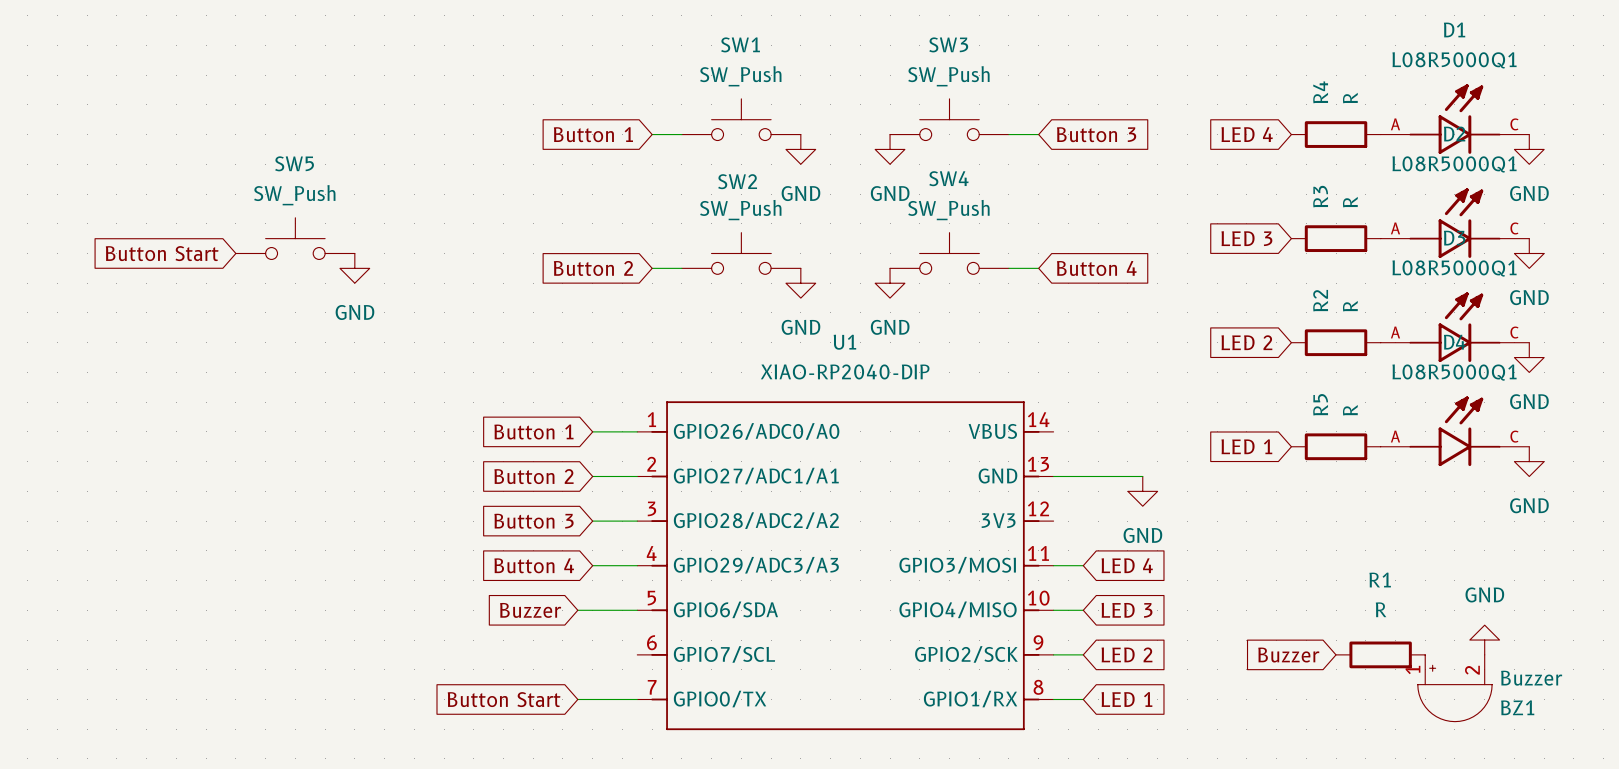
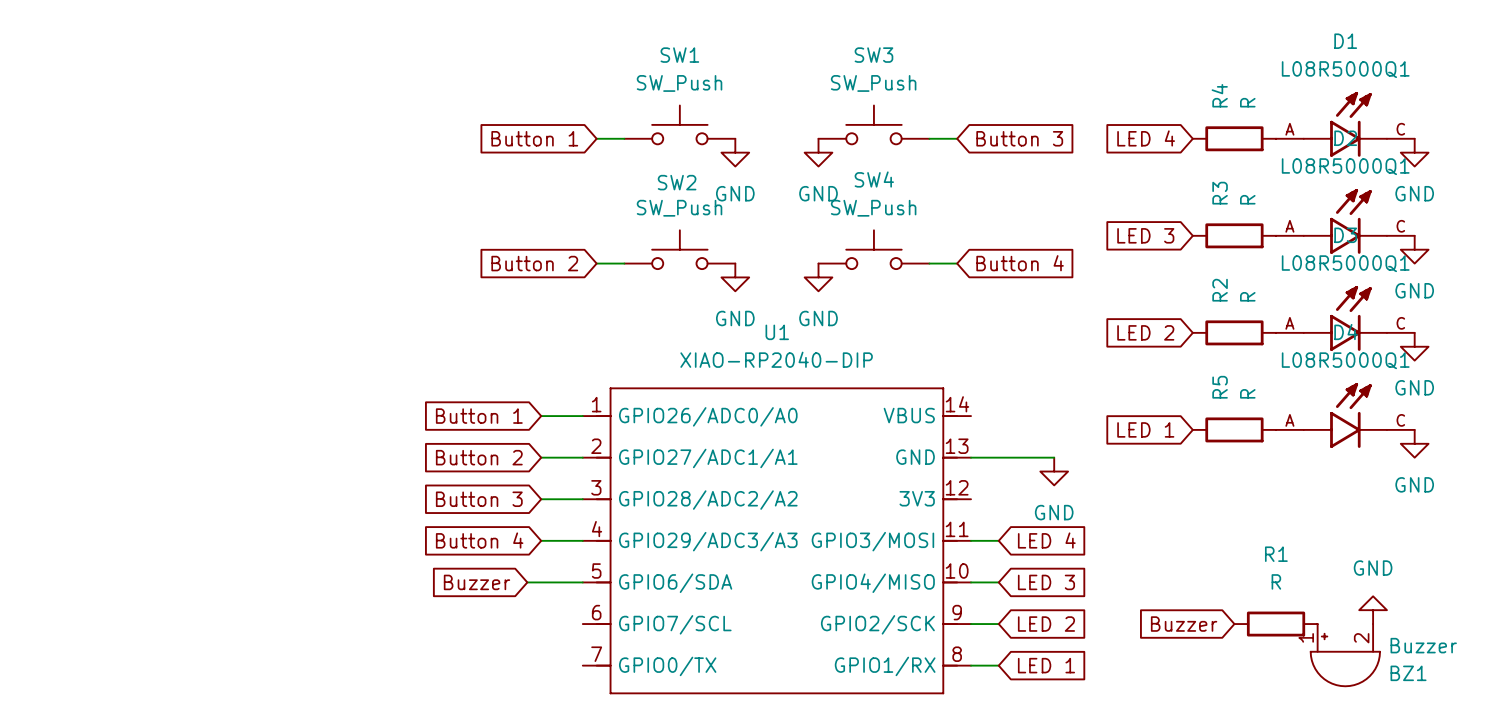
SW5: SW_Push (295, 238) -> none
global label: Button Start (162, 253) -> none
power symbol: GND (354, 268) -> none
global label: Button Start (504, 699) -> none
wire: (577, 699) (637, 699) -> none

